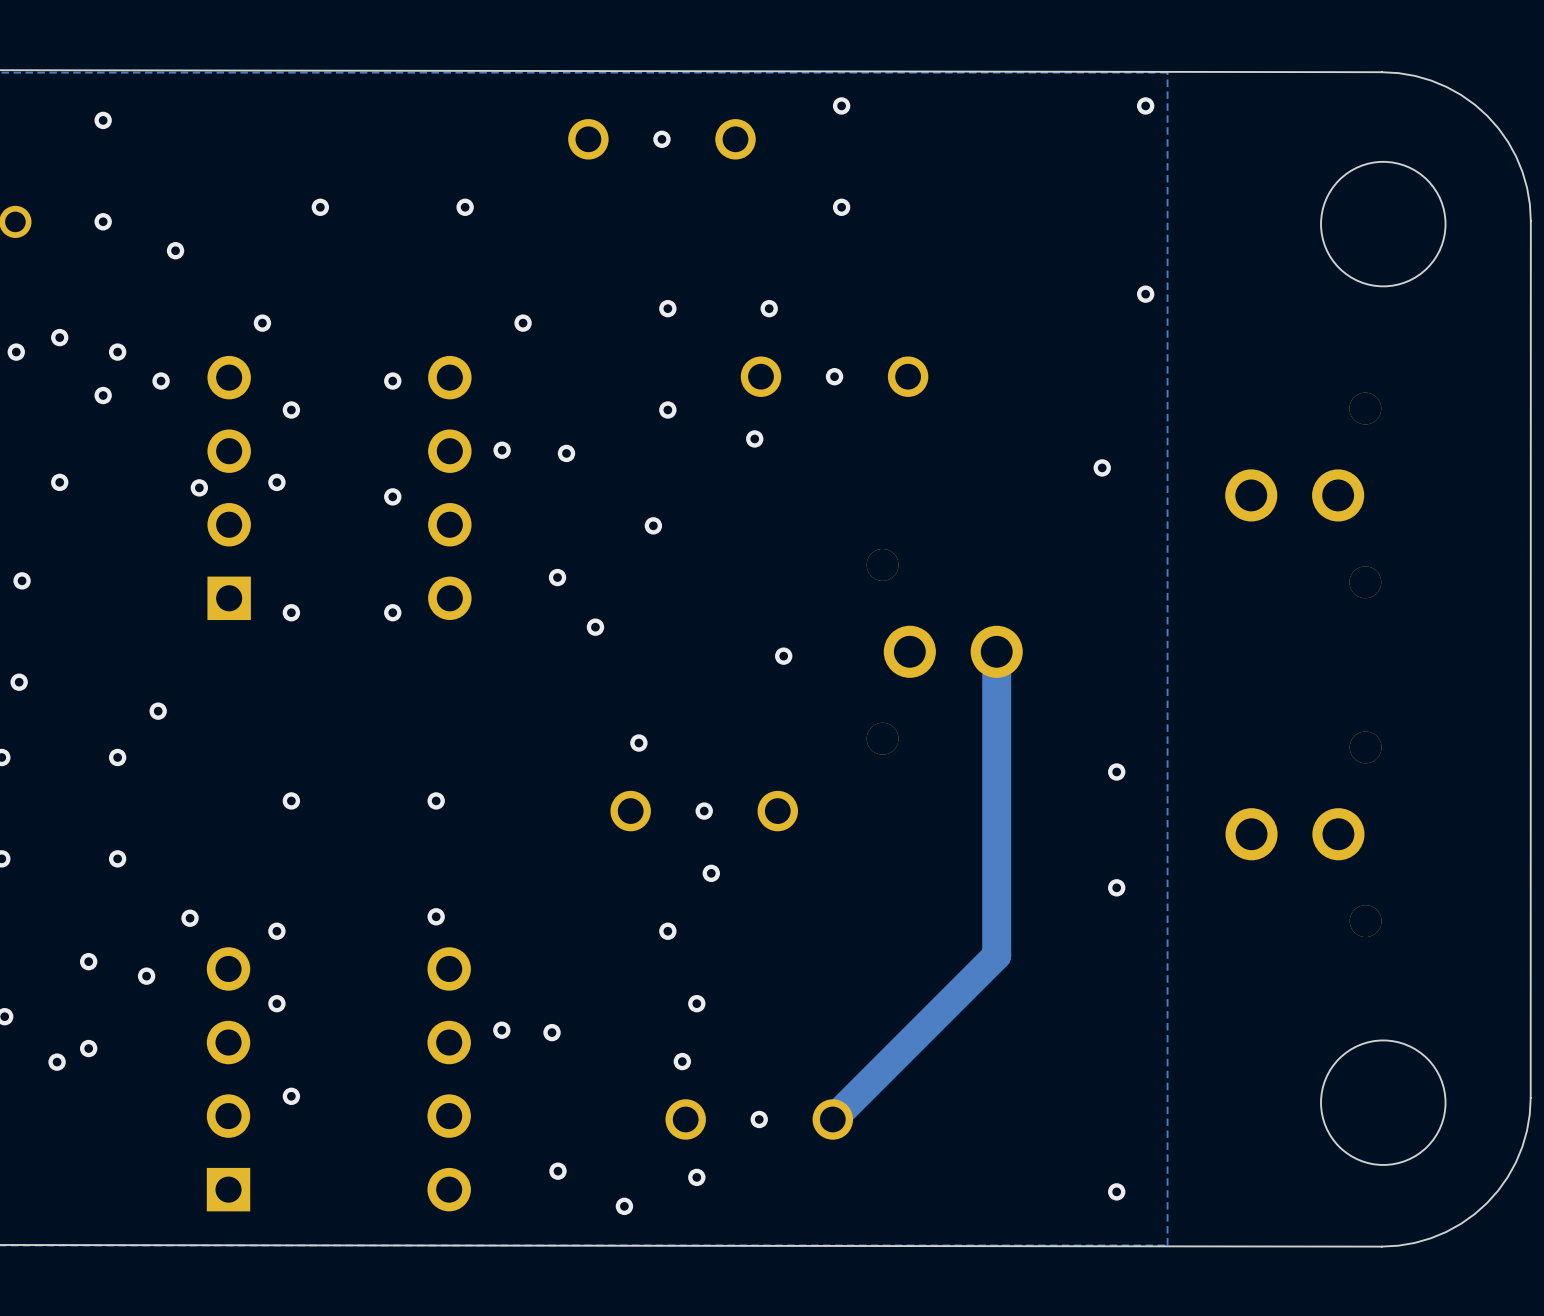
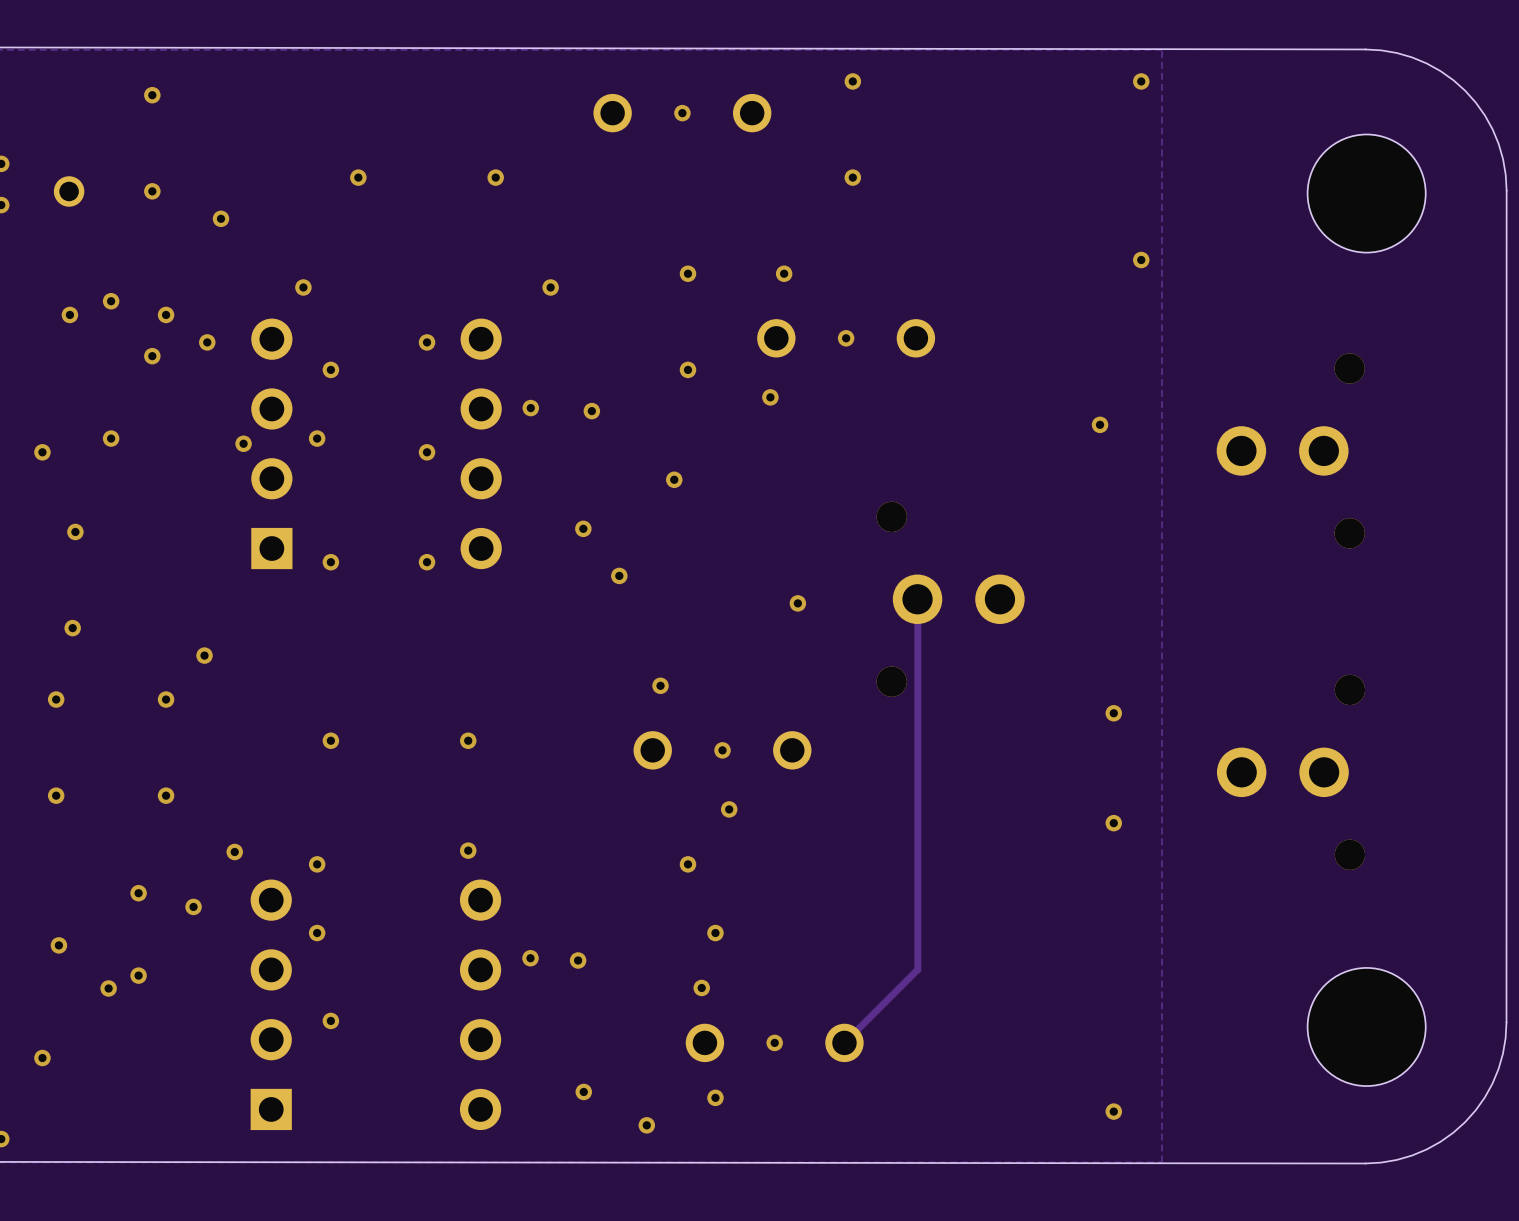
track: (996, 651) (996, 955) (910, 1042) -> (917, 599) (917, 969)
track width: thick (910, 1042) (832, 1119) -> thin (917, 969) (844, 1042)

